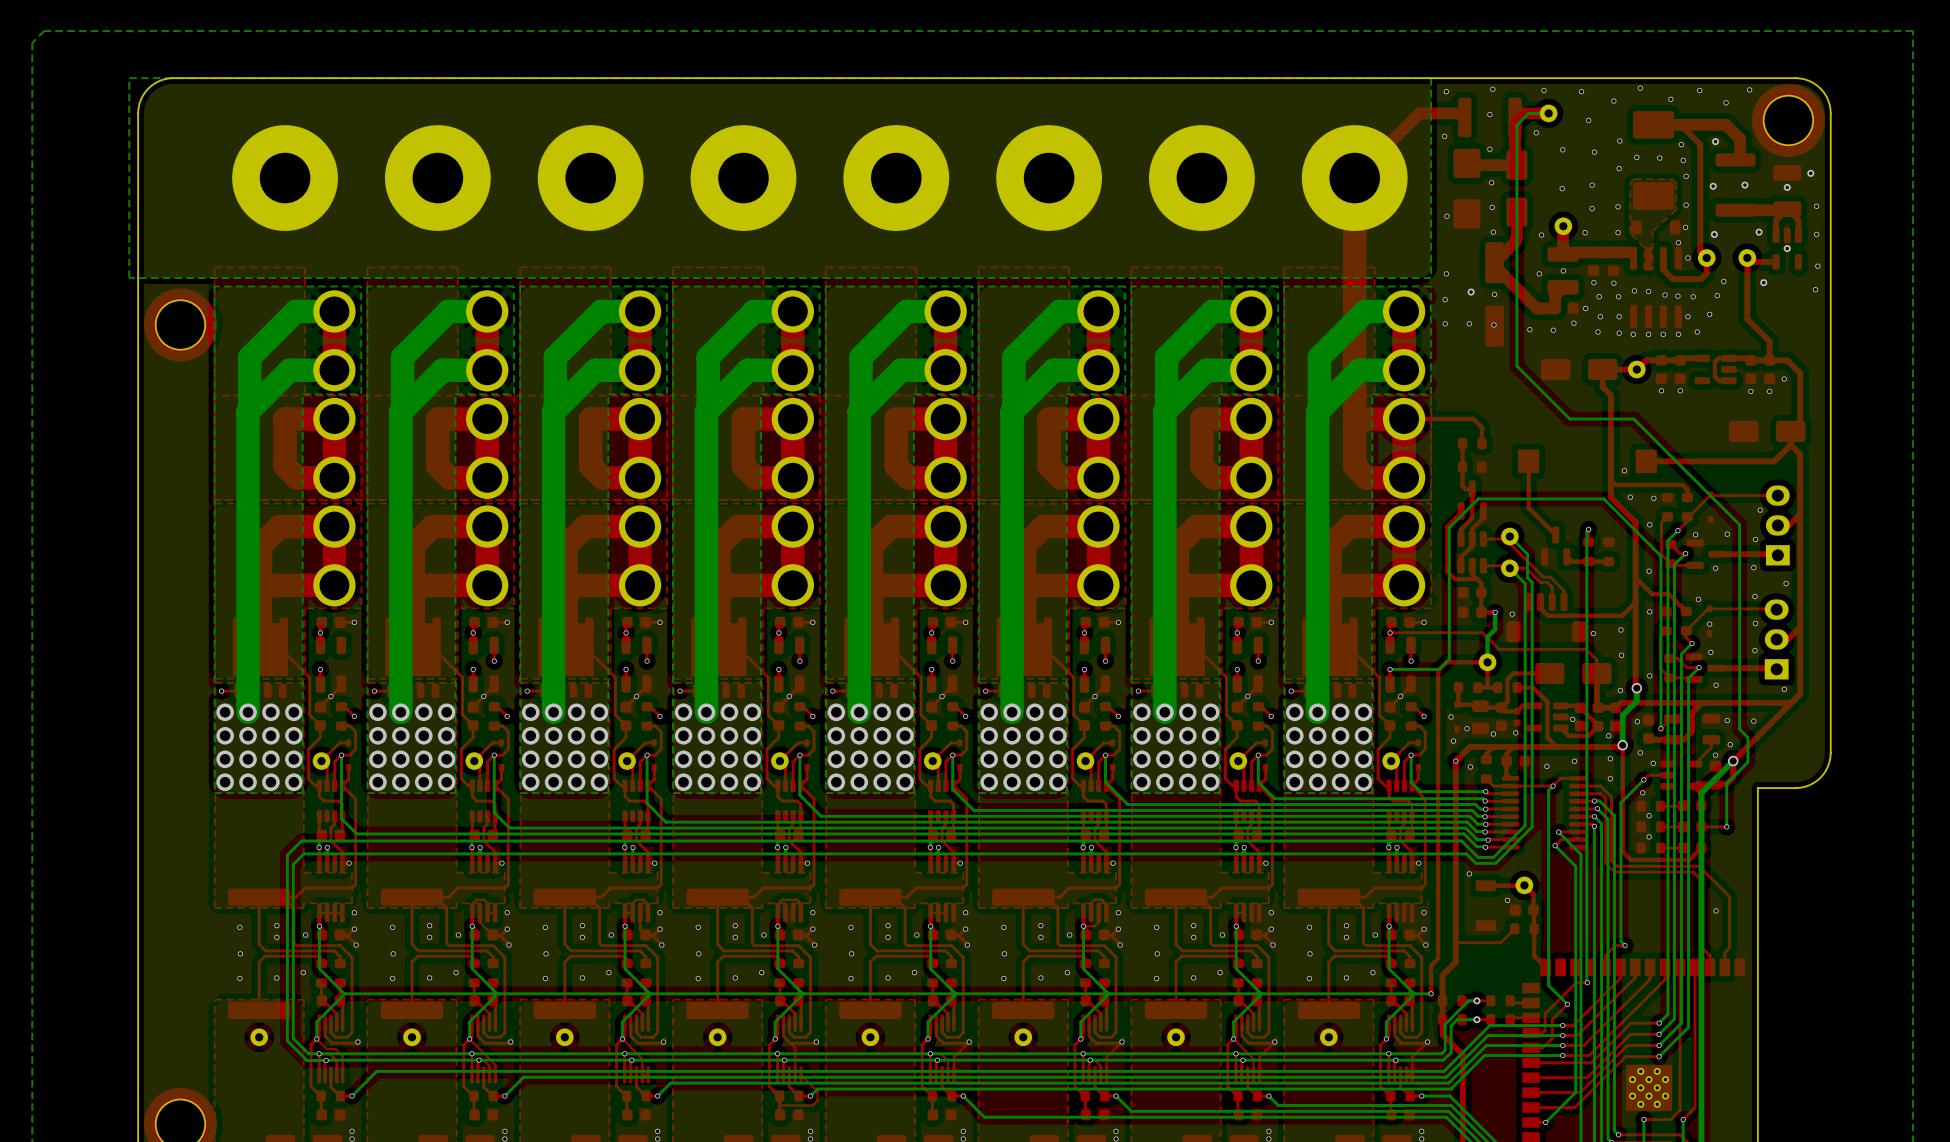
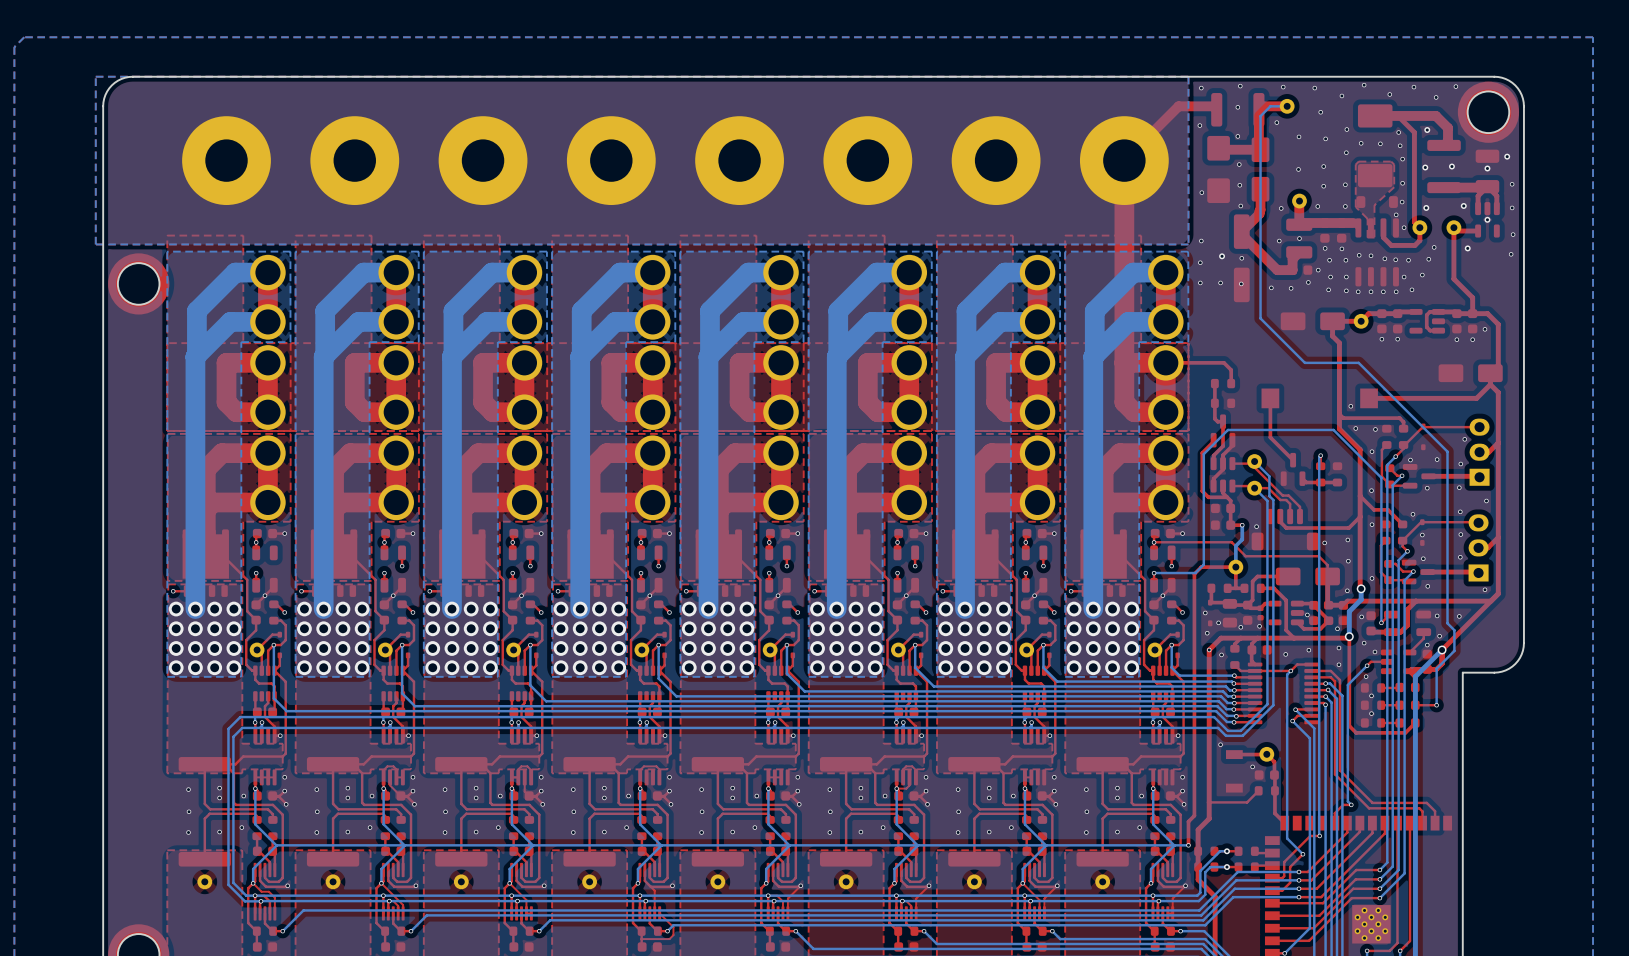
top track: (1611, 860) (1616, 866) (1699, 866) (1729, 896) (1729, 947) (1724, 953) -> (1339, 733) (1339, 770) (1372, 802) (1426, 802) (1435, 811)
top track: (1605, 863) (1614, 872) (1693, 872) (1700, 878) (1700, 945) (1709, 955) -> (1335, 735) (1335, 774) (1369, 808) (1419, 808) (1422, 813)
via: (1716, 910) -> none

